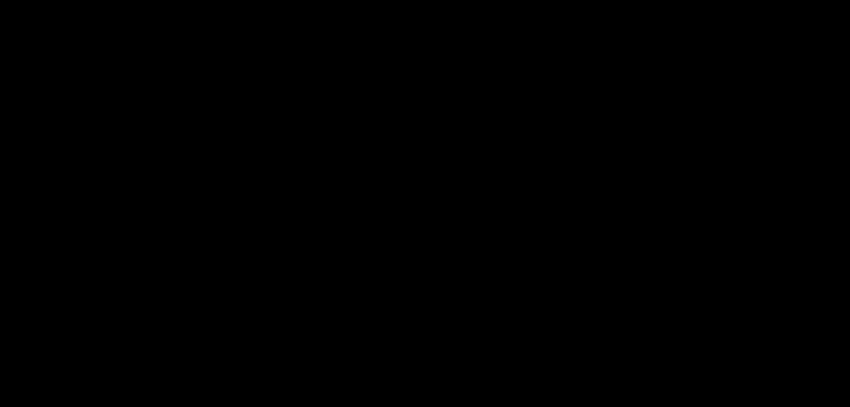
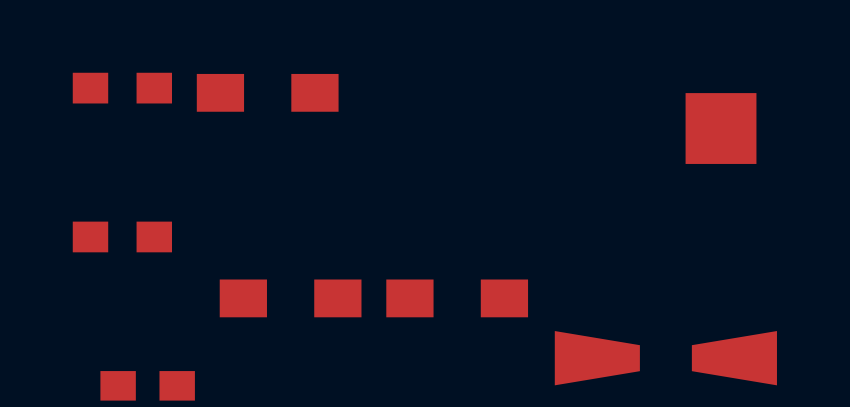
part: none -> (122, 88)
part: none -> (267, 92)
part: none -> (721, 128)
part: none -> (122, 236)
part: none -> (290, 298)
part: none -> (457, 298)
part: none -> (665, 358)
part: none -> (147, 385)

